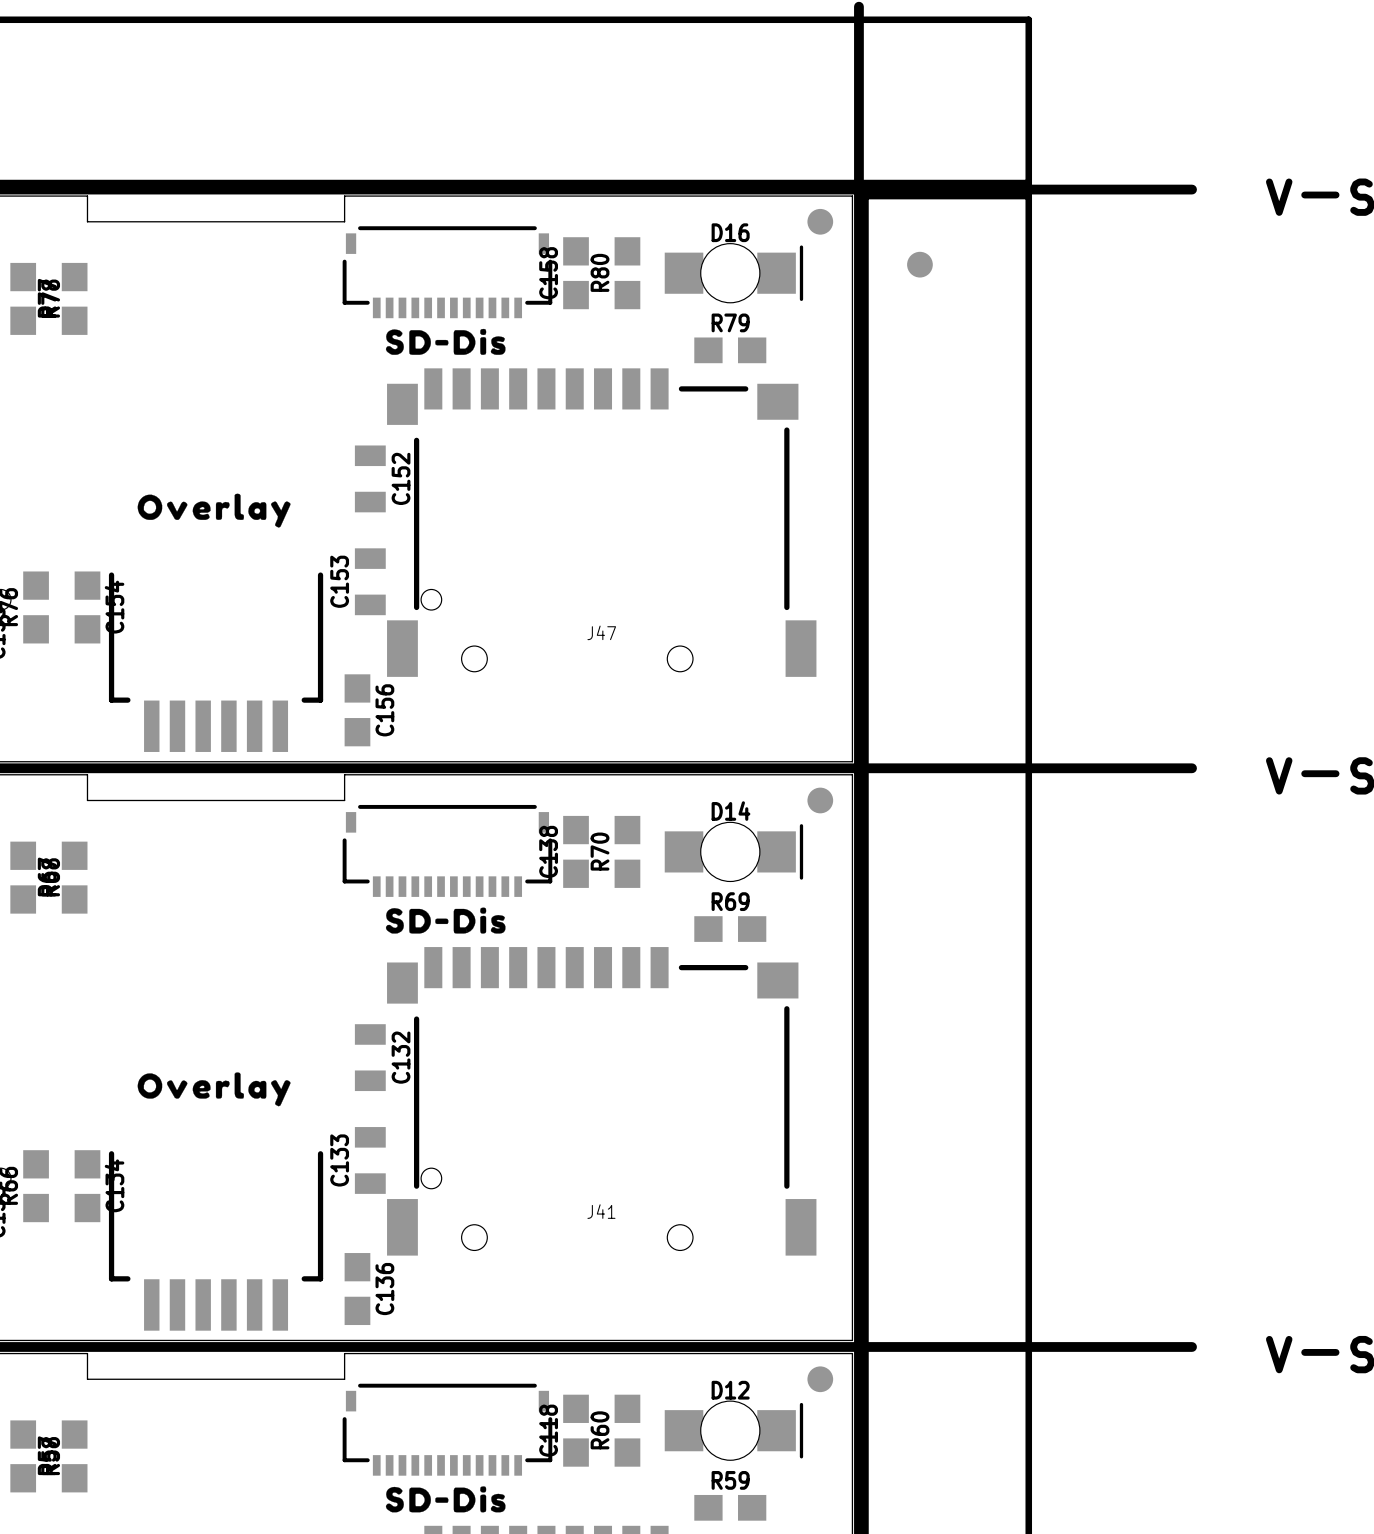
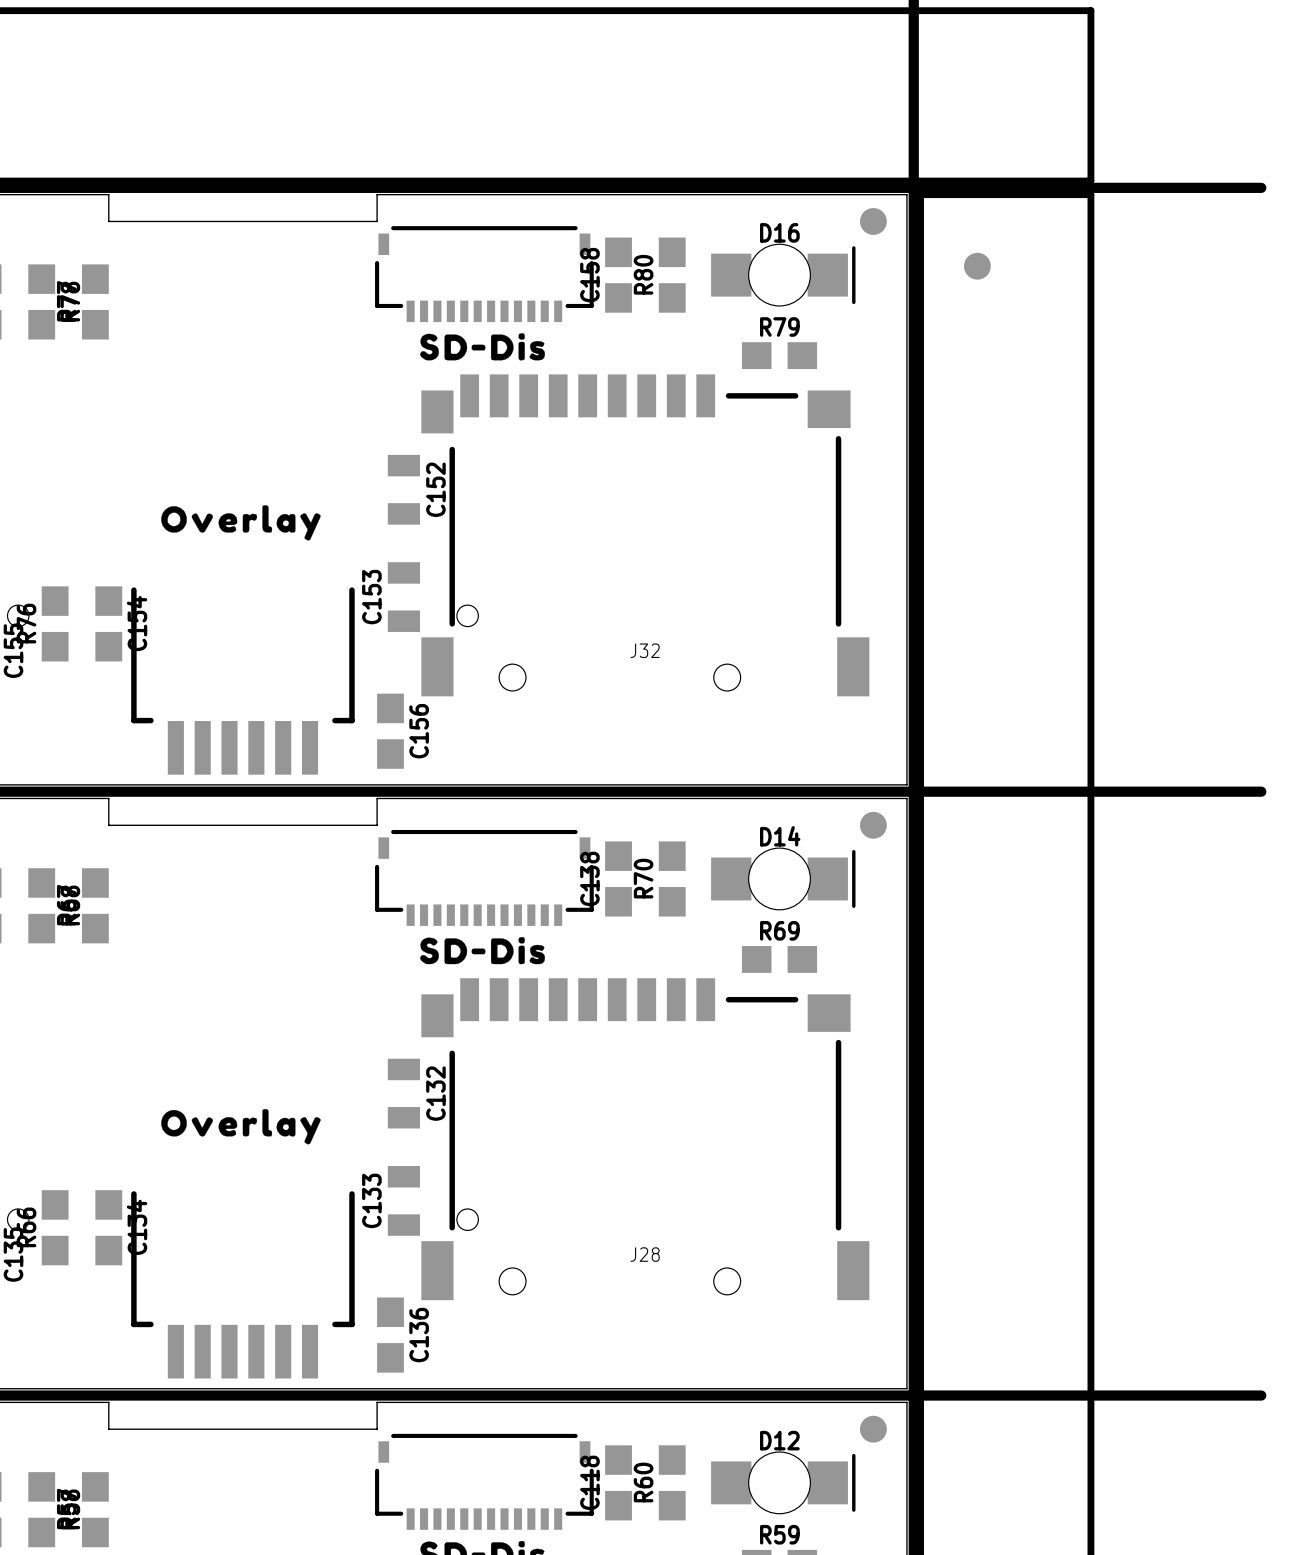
J47 name: J47 (601, 632) -> J32 (645, 650)
J41 name: J41 (601, 1211) -> J28 (645, 1254)

